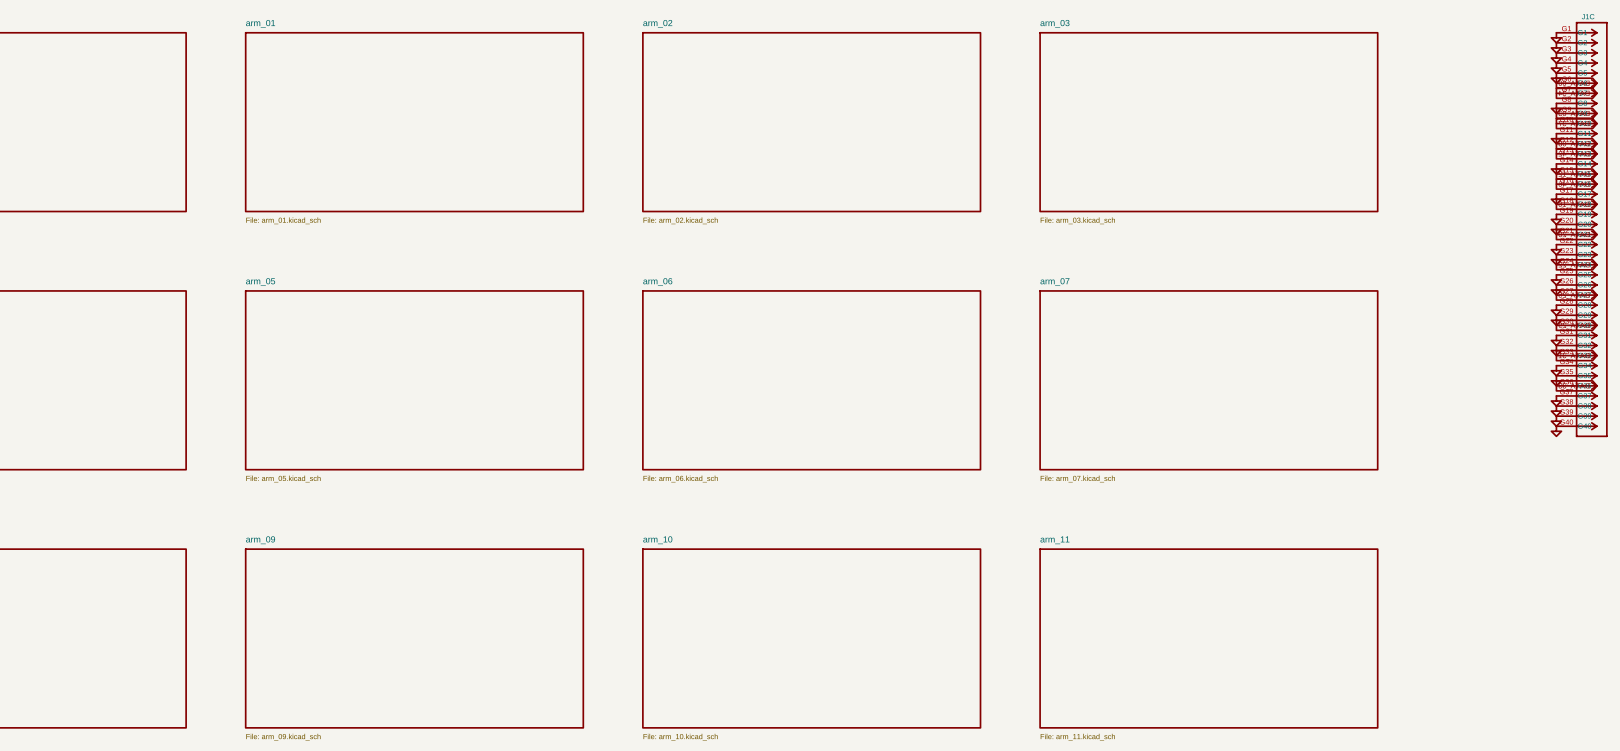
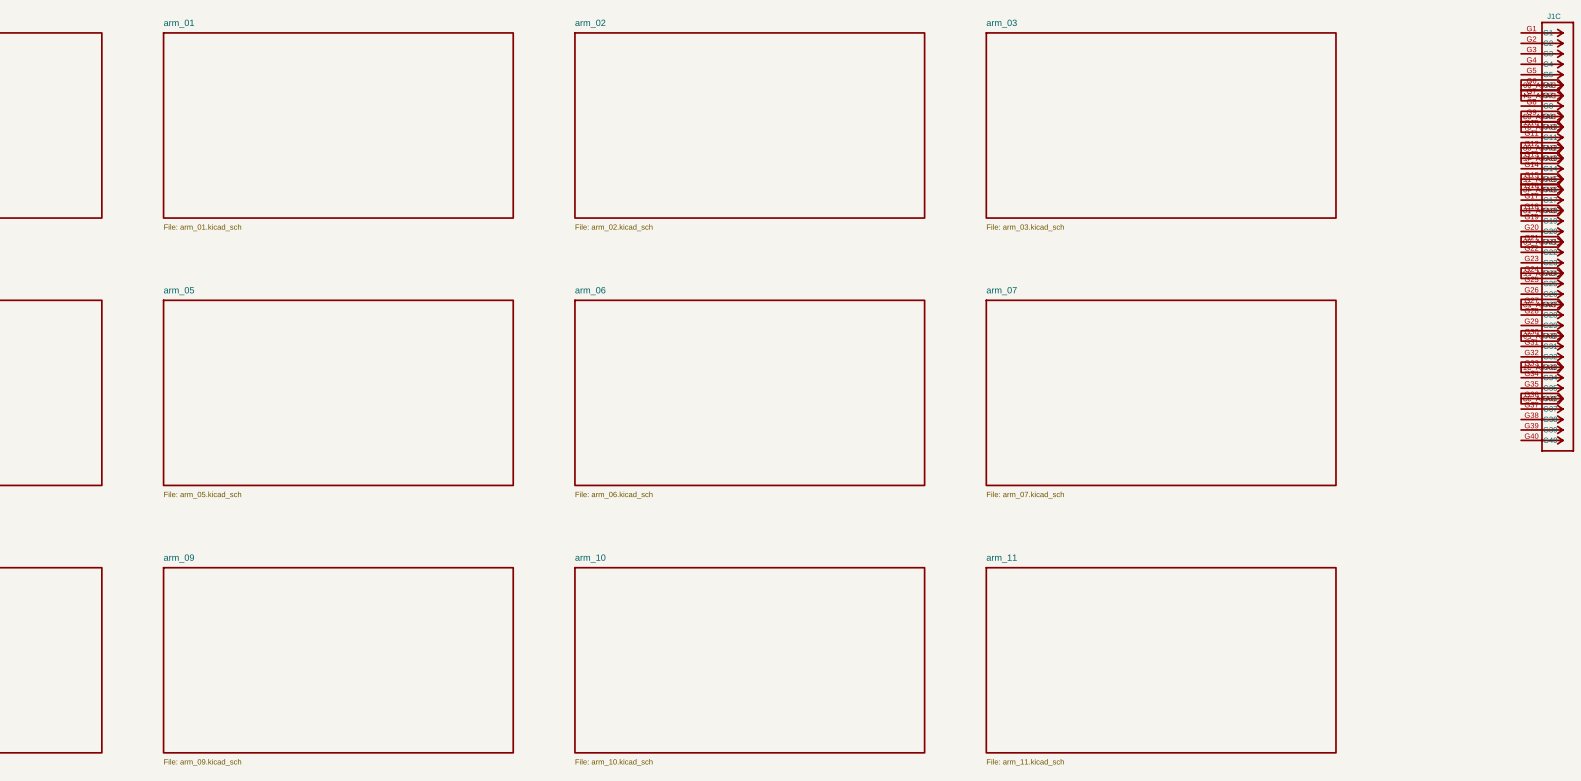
power symbol: (1556, 37) -> none
power symbol: (1556, 47) -> none
power symbol: (1556, 58) -> none
power symbol: (1556, 68) -> none
power symbol: (1556, 78) -> none
power symbol: (1556, 108) -> none
power symbol: (1556, 138) -> none
power symbol: (1556, 168) -> none
power symbol: (1556, 199) -> none
power symbol: (1556, 219) -> none
power symbol: (1556, 229) -> none
power symbol: (1556, 249) -> none
power symbol: (1556, 259) -> none
power symbol: (1556, 279) -> none
power symbol: (1556, 290) -> none
power symbol: (1556, 310) -> none
power symbol: (1556, 320) -> none
power symbol: (1556, 340) -> none
power symbol: (1556, 350) -> none
power symbol: (1556, 370) -> none
power symbol: (1556, 380) -> none
power symbol: (1556, 401) -> none
power symbol: (1556, 411) -> none
power symbol: (1556, 421) -> none
power symbol: (1556, 431) -> none

